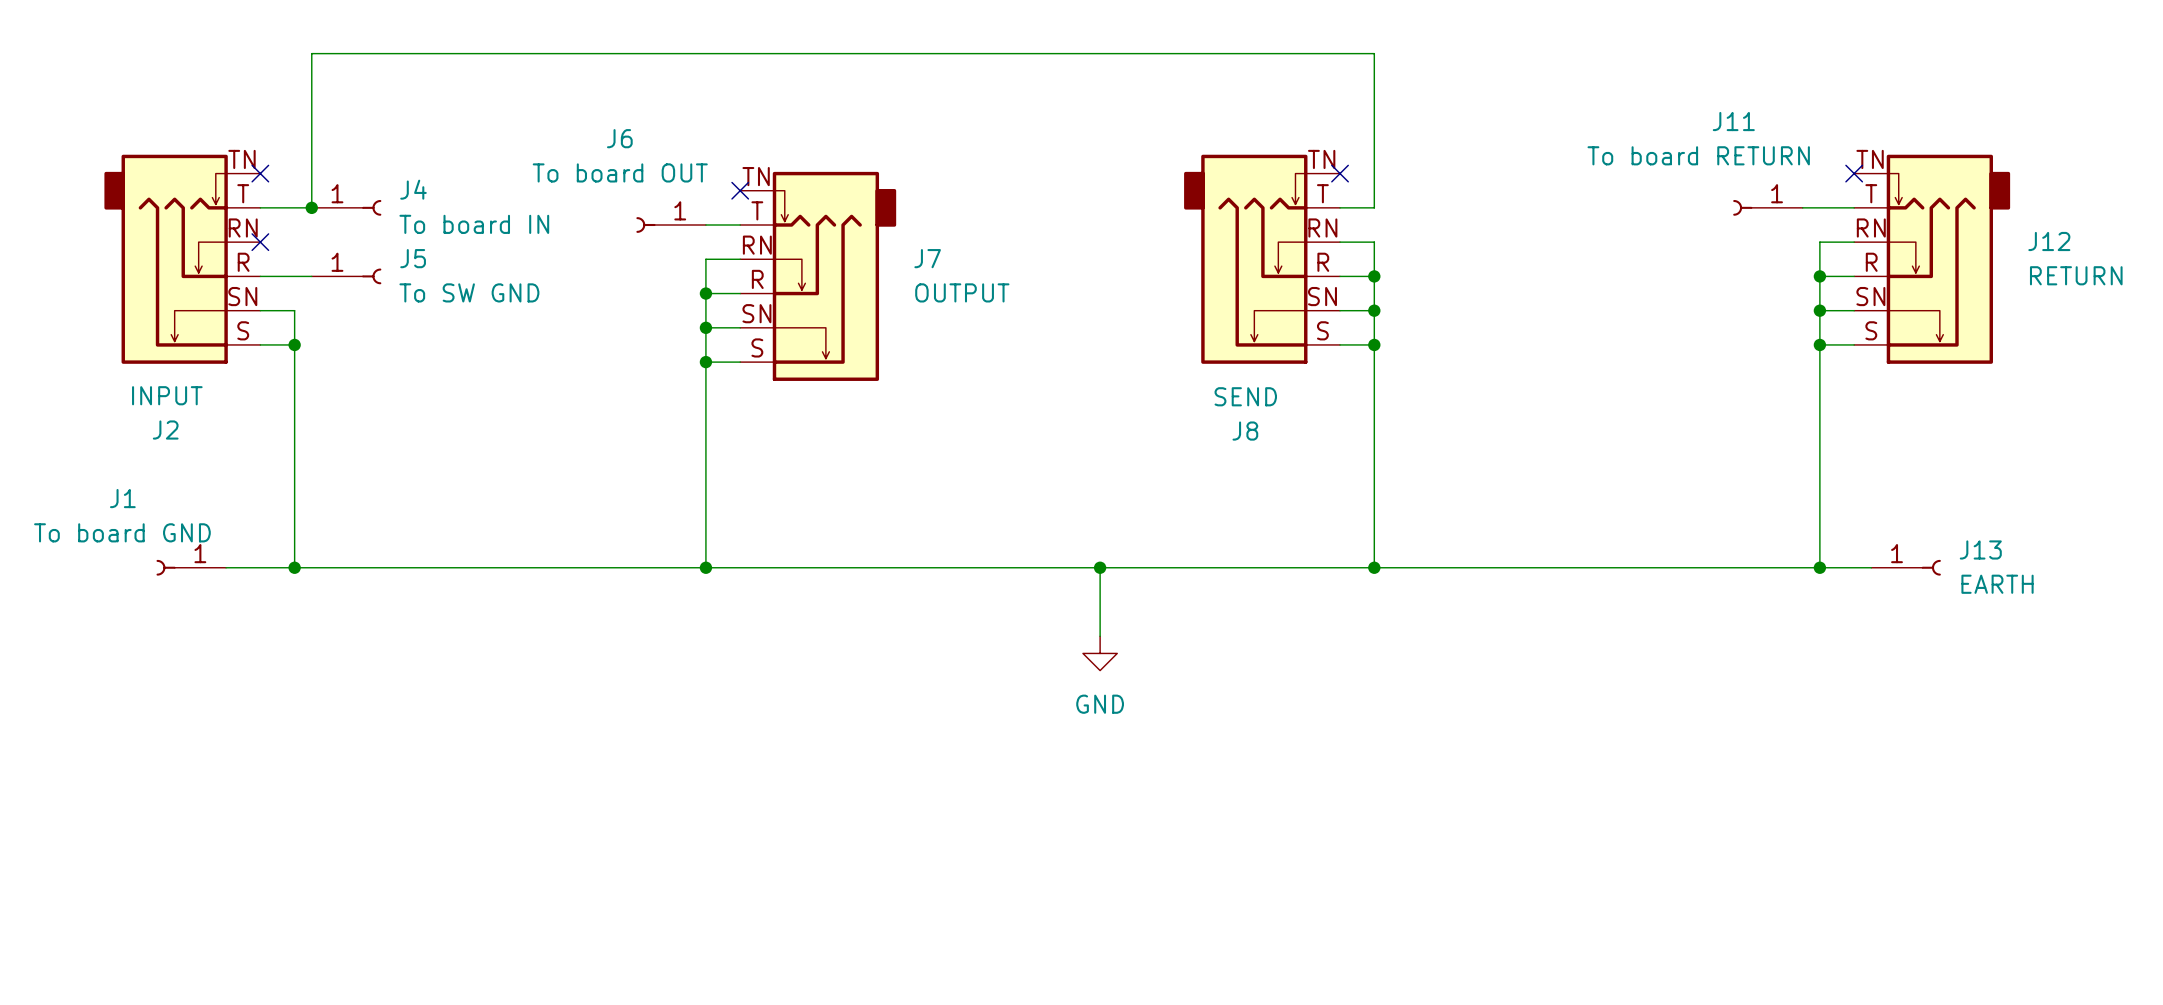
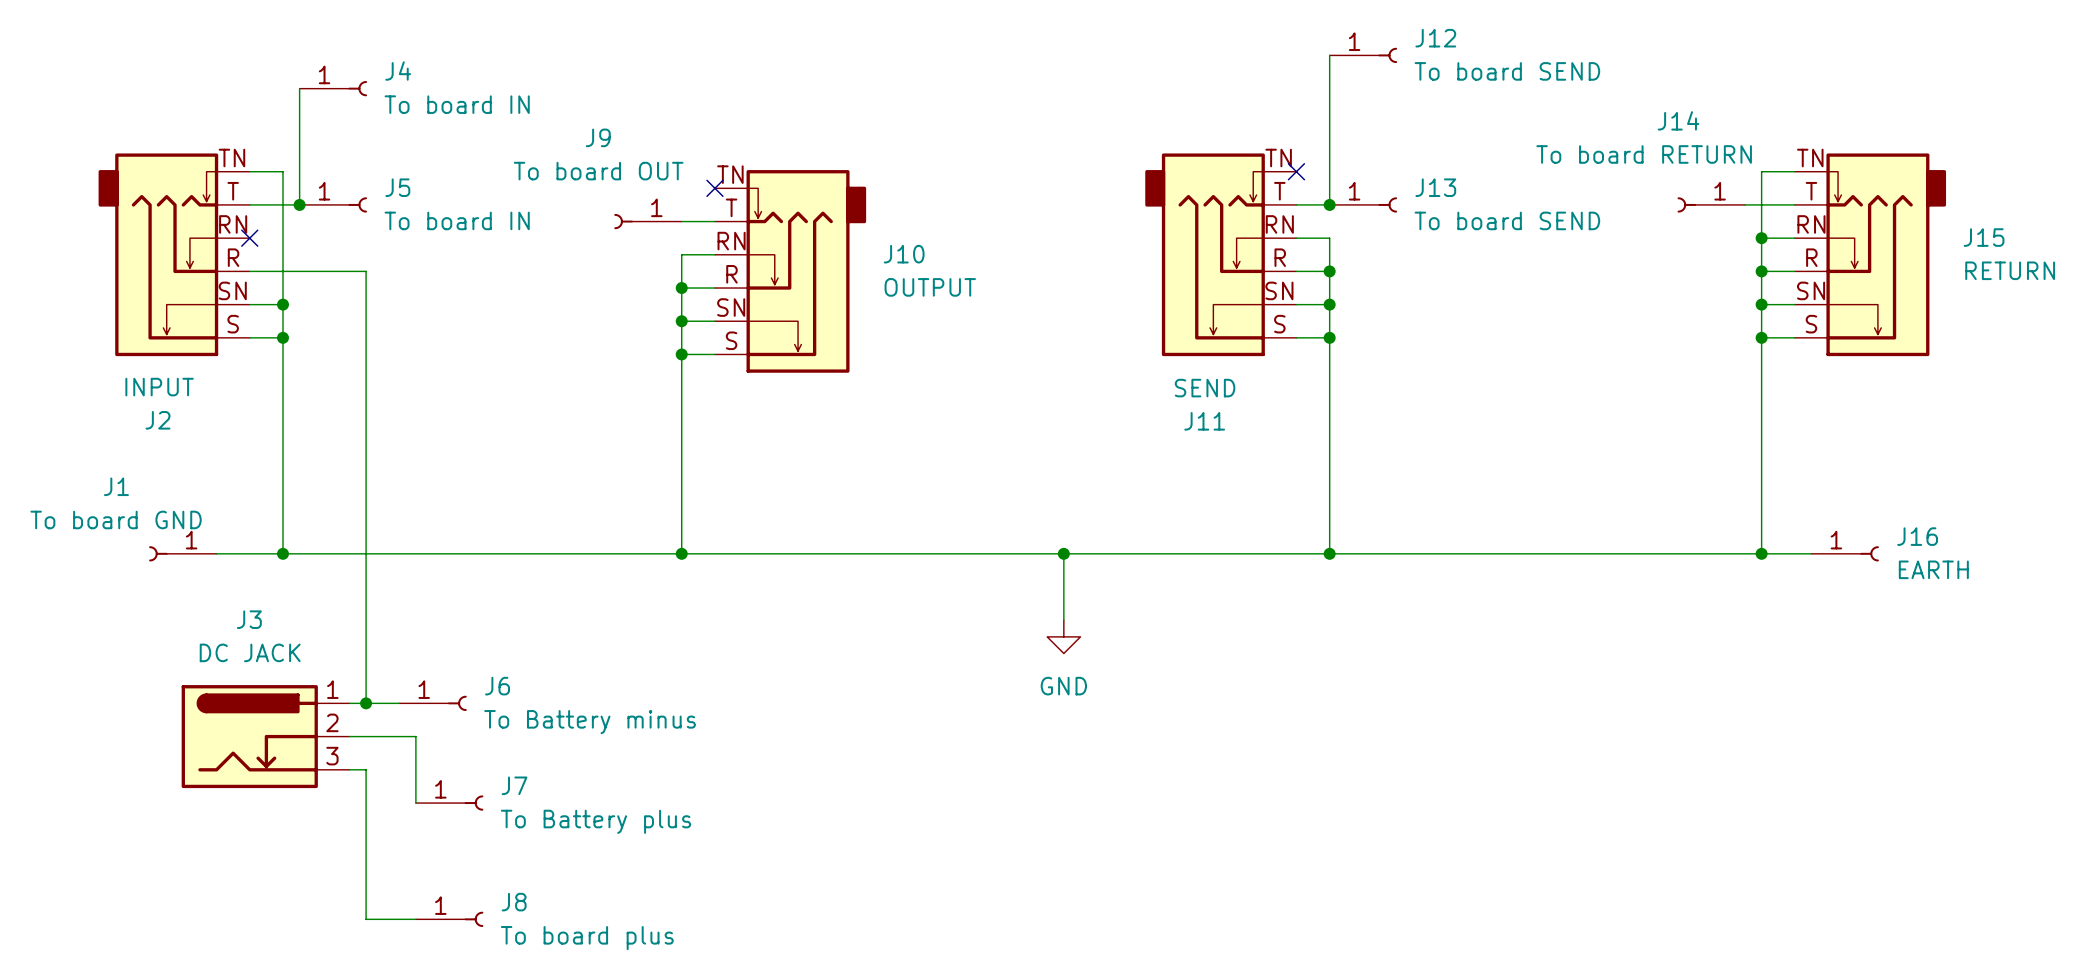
wire: (1374, 53) (311, 53) (311, 87) -> none
J12: none -> To board SEND (1363, 55)
J4: none -> To board IN (333, 88)
J11 name: J11 (1733, 121) -> J14 (1678, 120)
J6 name: J6 (619, 138) -> J9 (598, 137)
wire: none -> (249, 171) (282, 171) (282, 304)
no-connect mark: (260, 173) -> none
wire: none -> (1794, 171) (1761, 171) (1761, 238)
no-connect mark: (1854, 173) -> none
J4 name: J4 (413, 189) -> J5 (397, 187)
junction: none -> (1329, 204)
J13: none -> To board SEND (1363, 204)
J12 name: J12 (2049, 241) -> J15 (1984, 237)
junction: none -> (1761, 238)
J7 name: J7 (927, 258) -> J10 (904, 254)
wire: none -> (299, 271) (366, 271) (366, 703)
J5: To SW GND (346, 276) -> none
junction: none -> (282, 304)
J8 name: J8 (1245, 431) -> J11 (1204, 421)
J13 name: J13 (1980, 549) -> J16 (1917, 536)
wire: none -> (349, 703) (399, 703)
junction: none -> (366, 703)
J6: none -> To Battery minus (433, 703)
J3: none -> DC JACK (265, 736)
wire: none -> (349, 736) (415, 736) (415, 803)
wire: none -> (349, 769) (366, 769) (366, 919) (415, 919)
J7: none -> To Battery plus (449, 803)
J8: none -> To board plus (449, 919)

